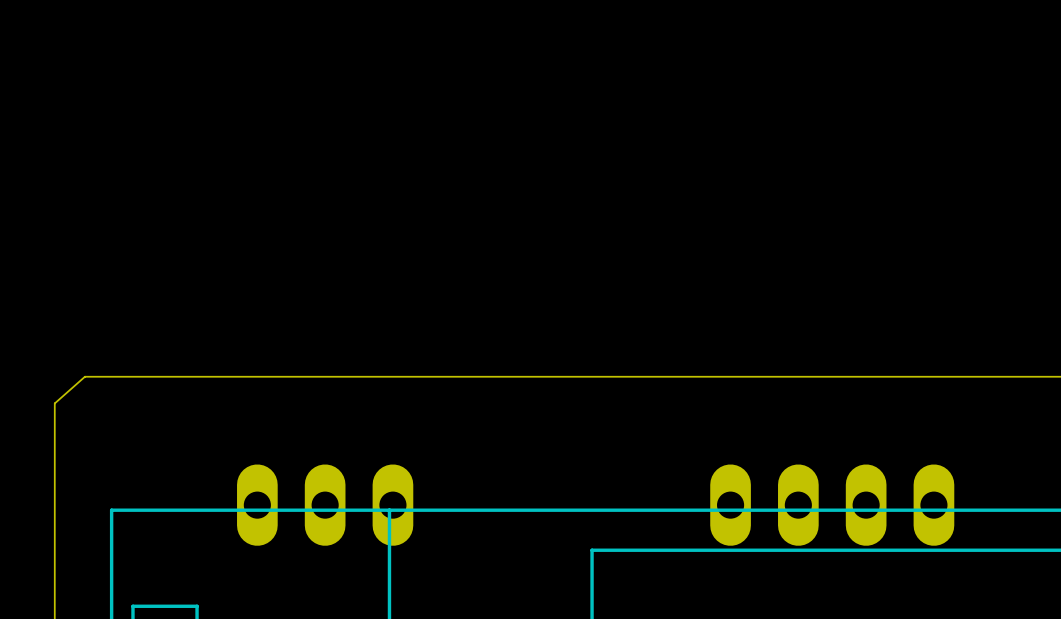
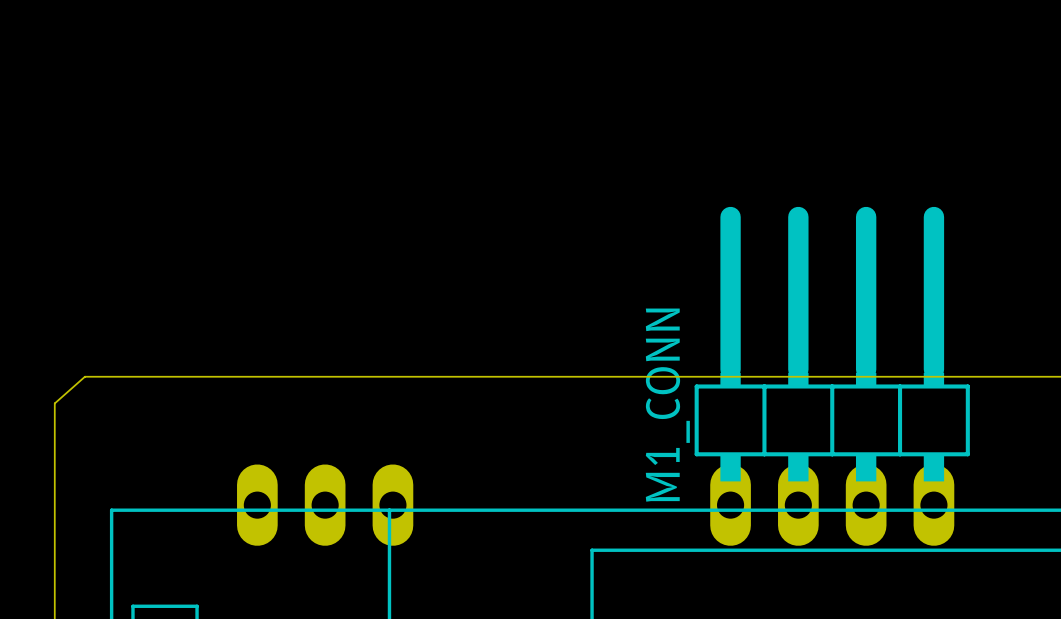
M1_CONN: none -> (832, 376)
part: (832, 505) -> none

